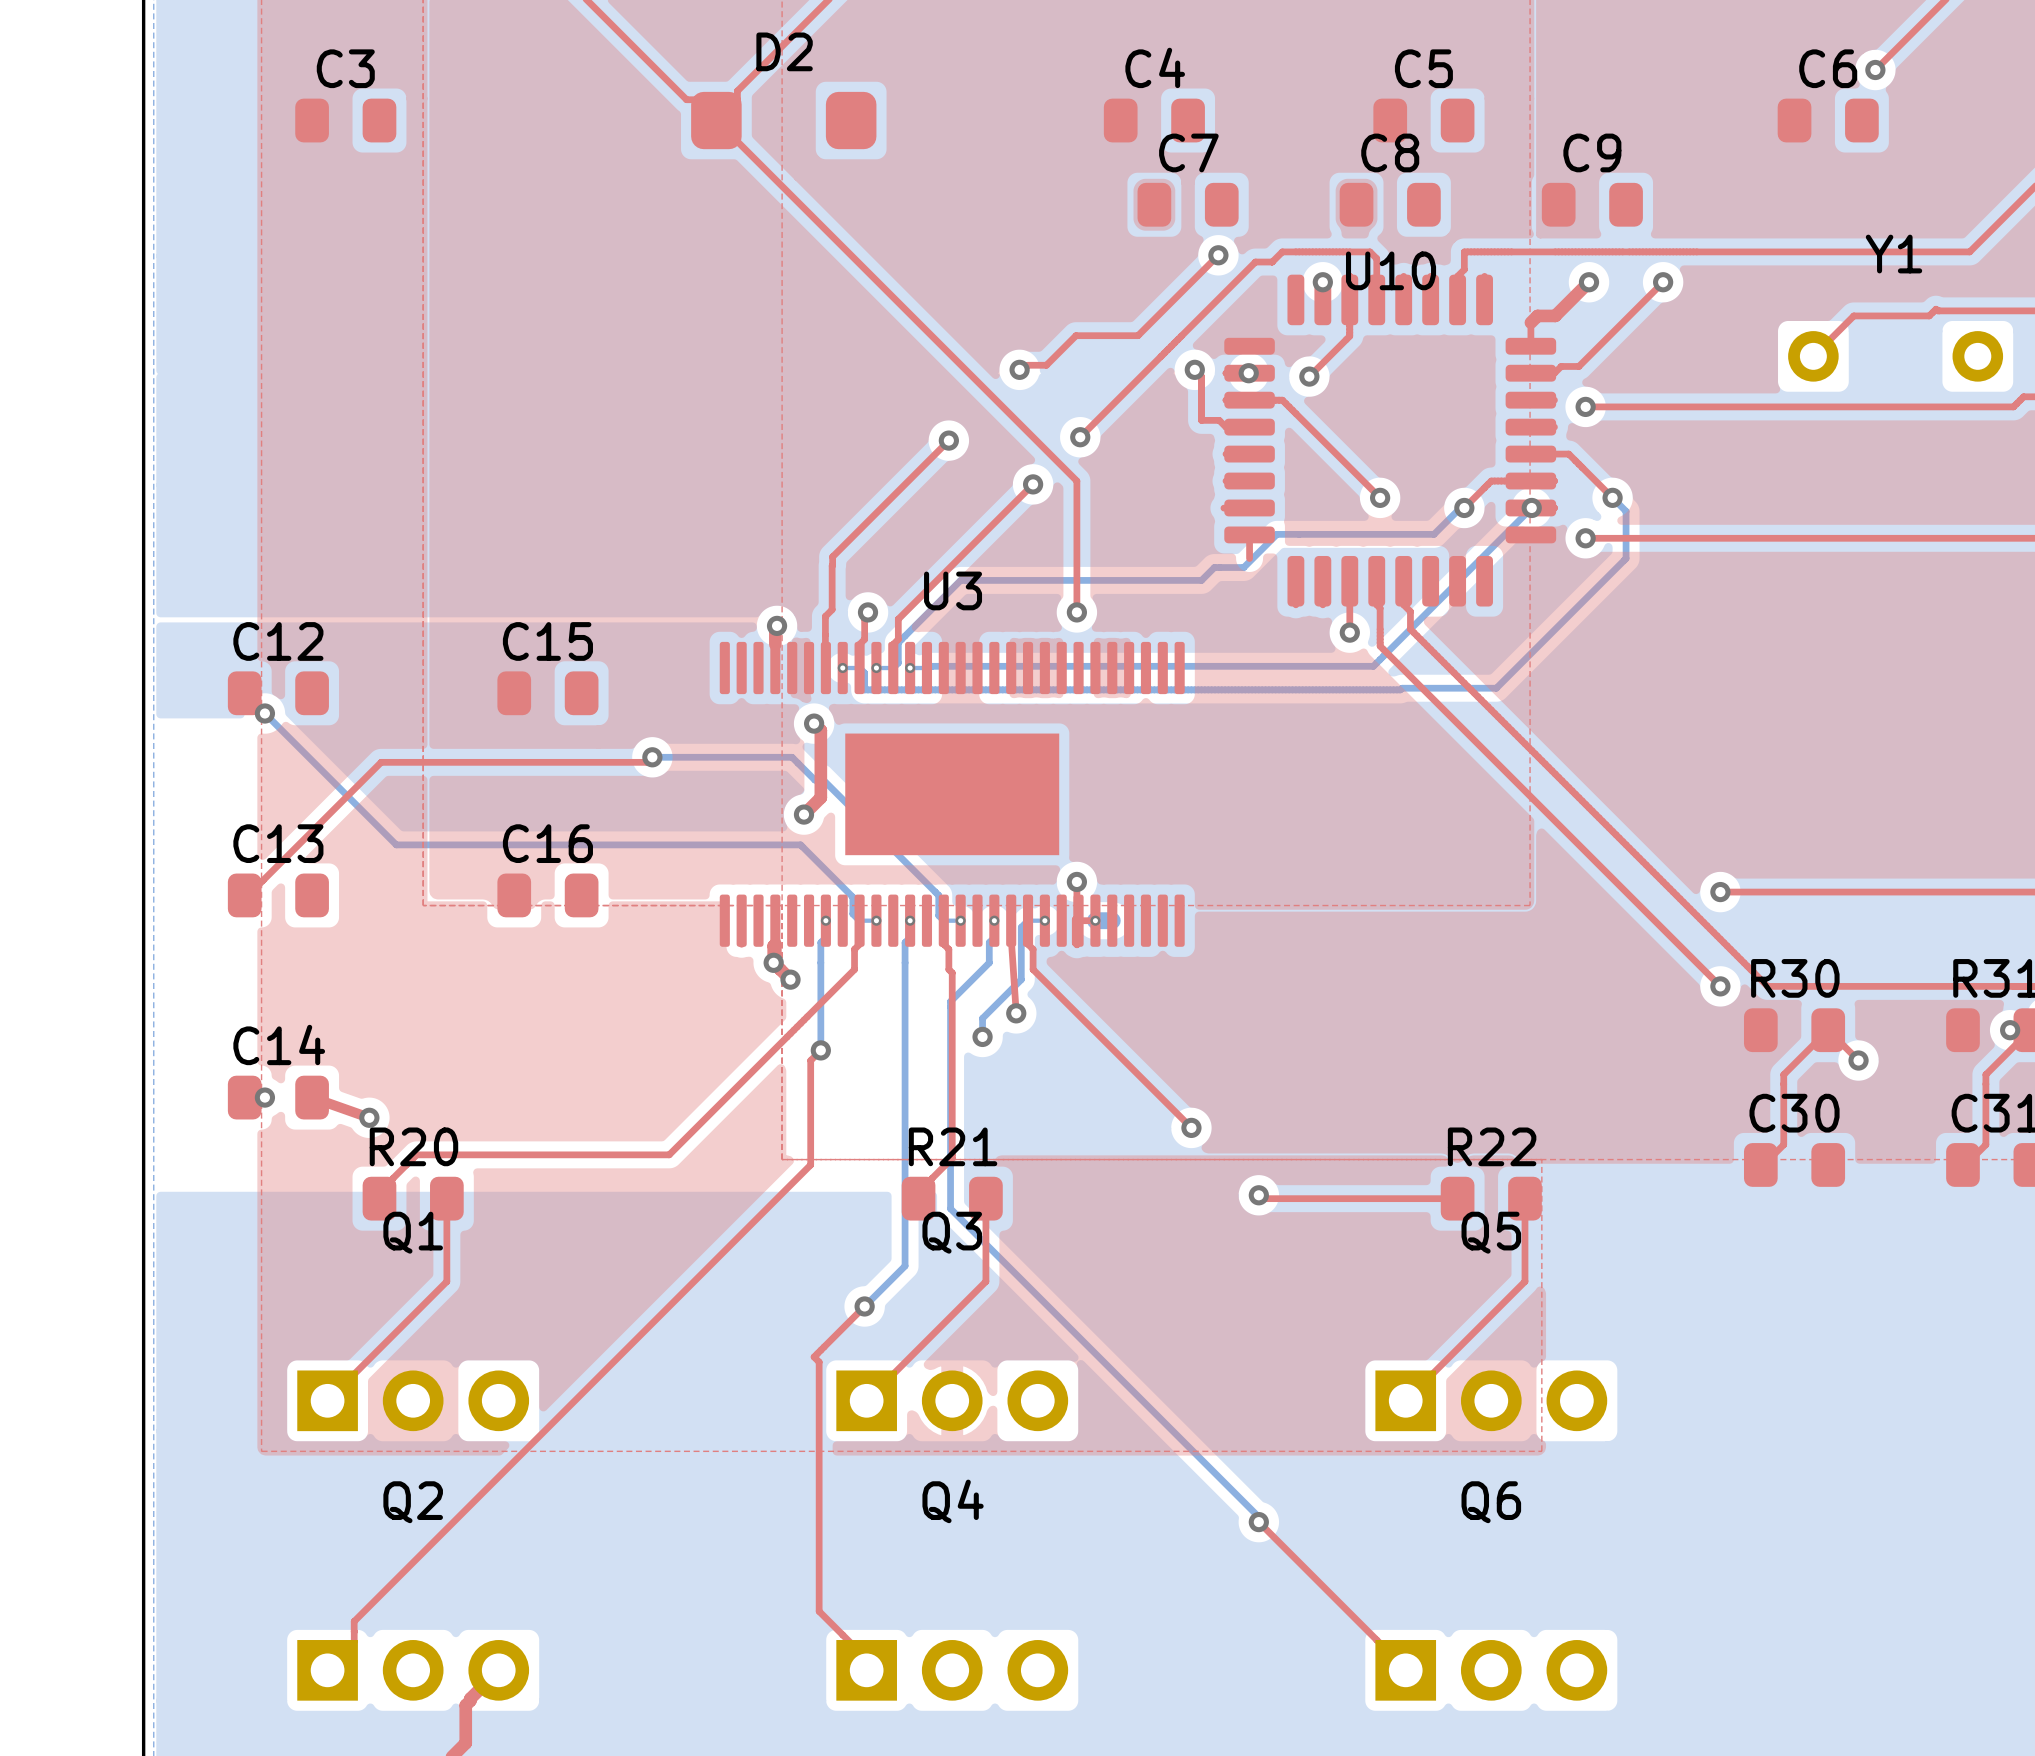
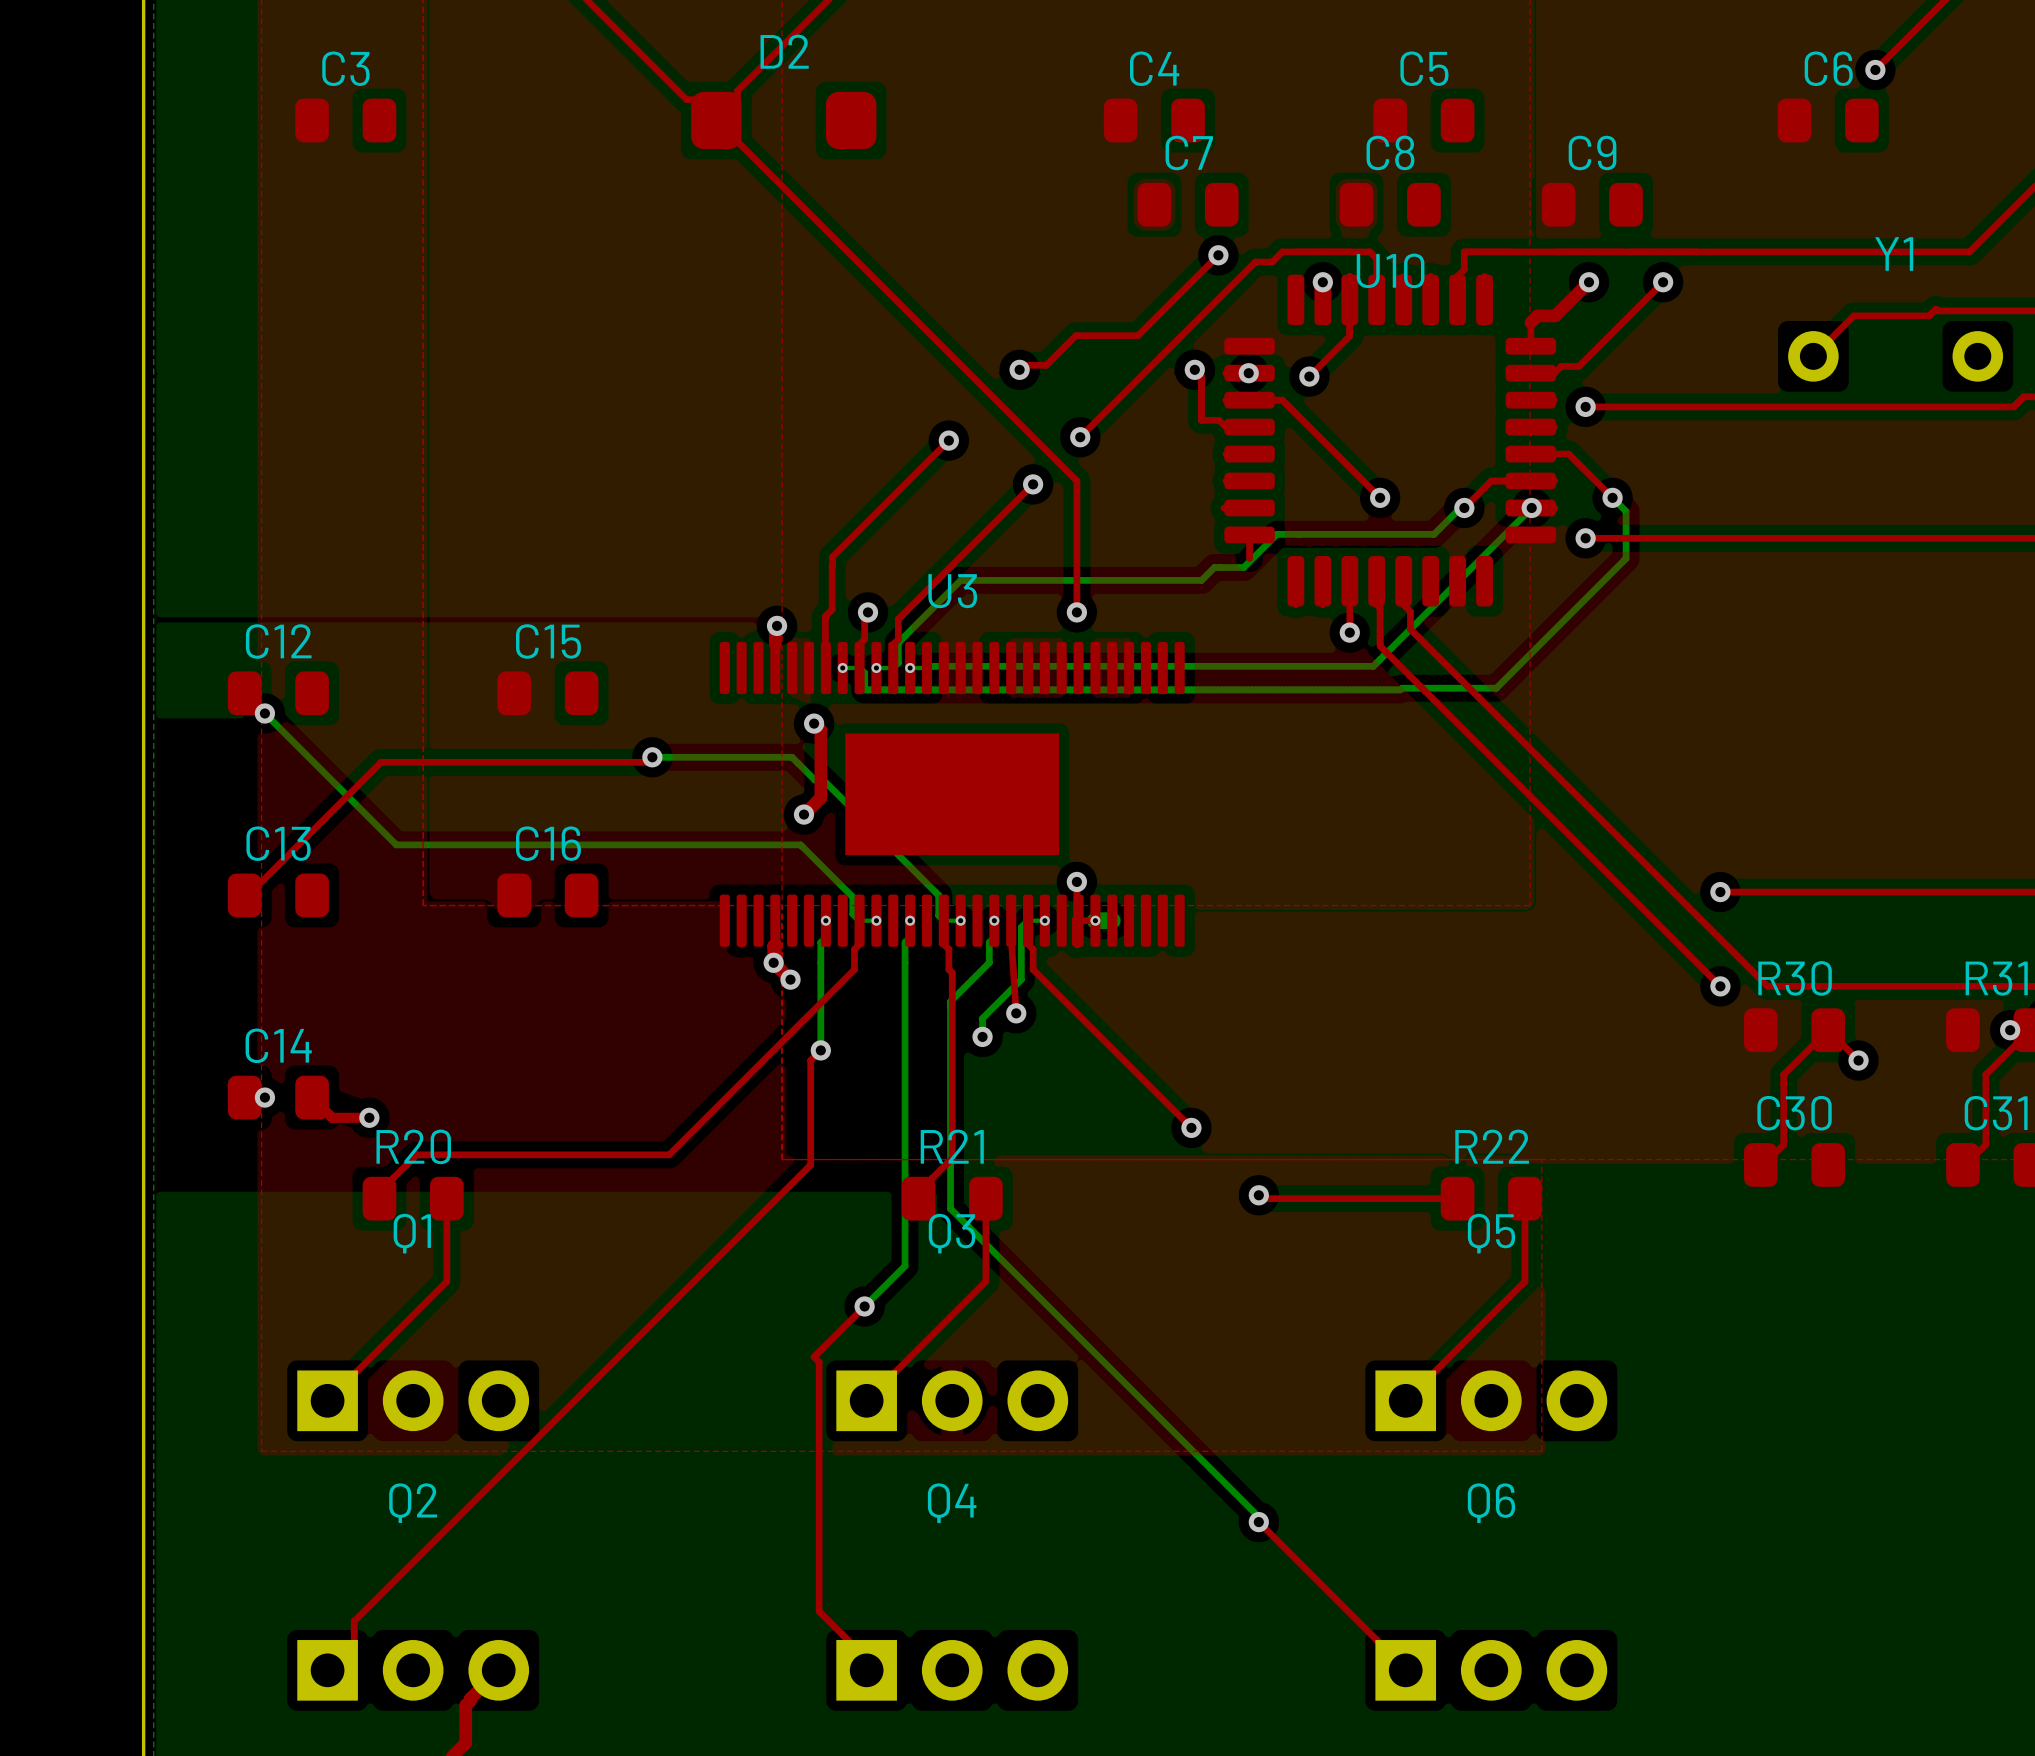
top track: (312, 1097) (369, 1117) -> (312, 1097) (332, 1117) (369, 1117)

